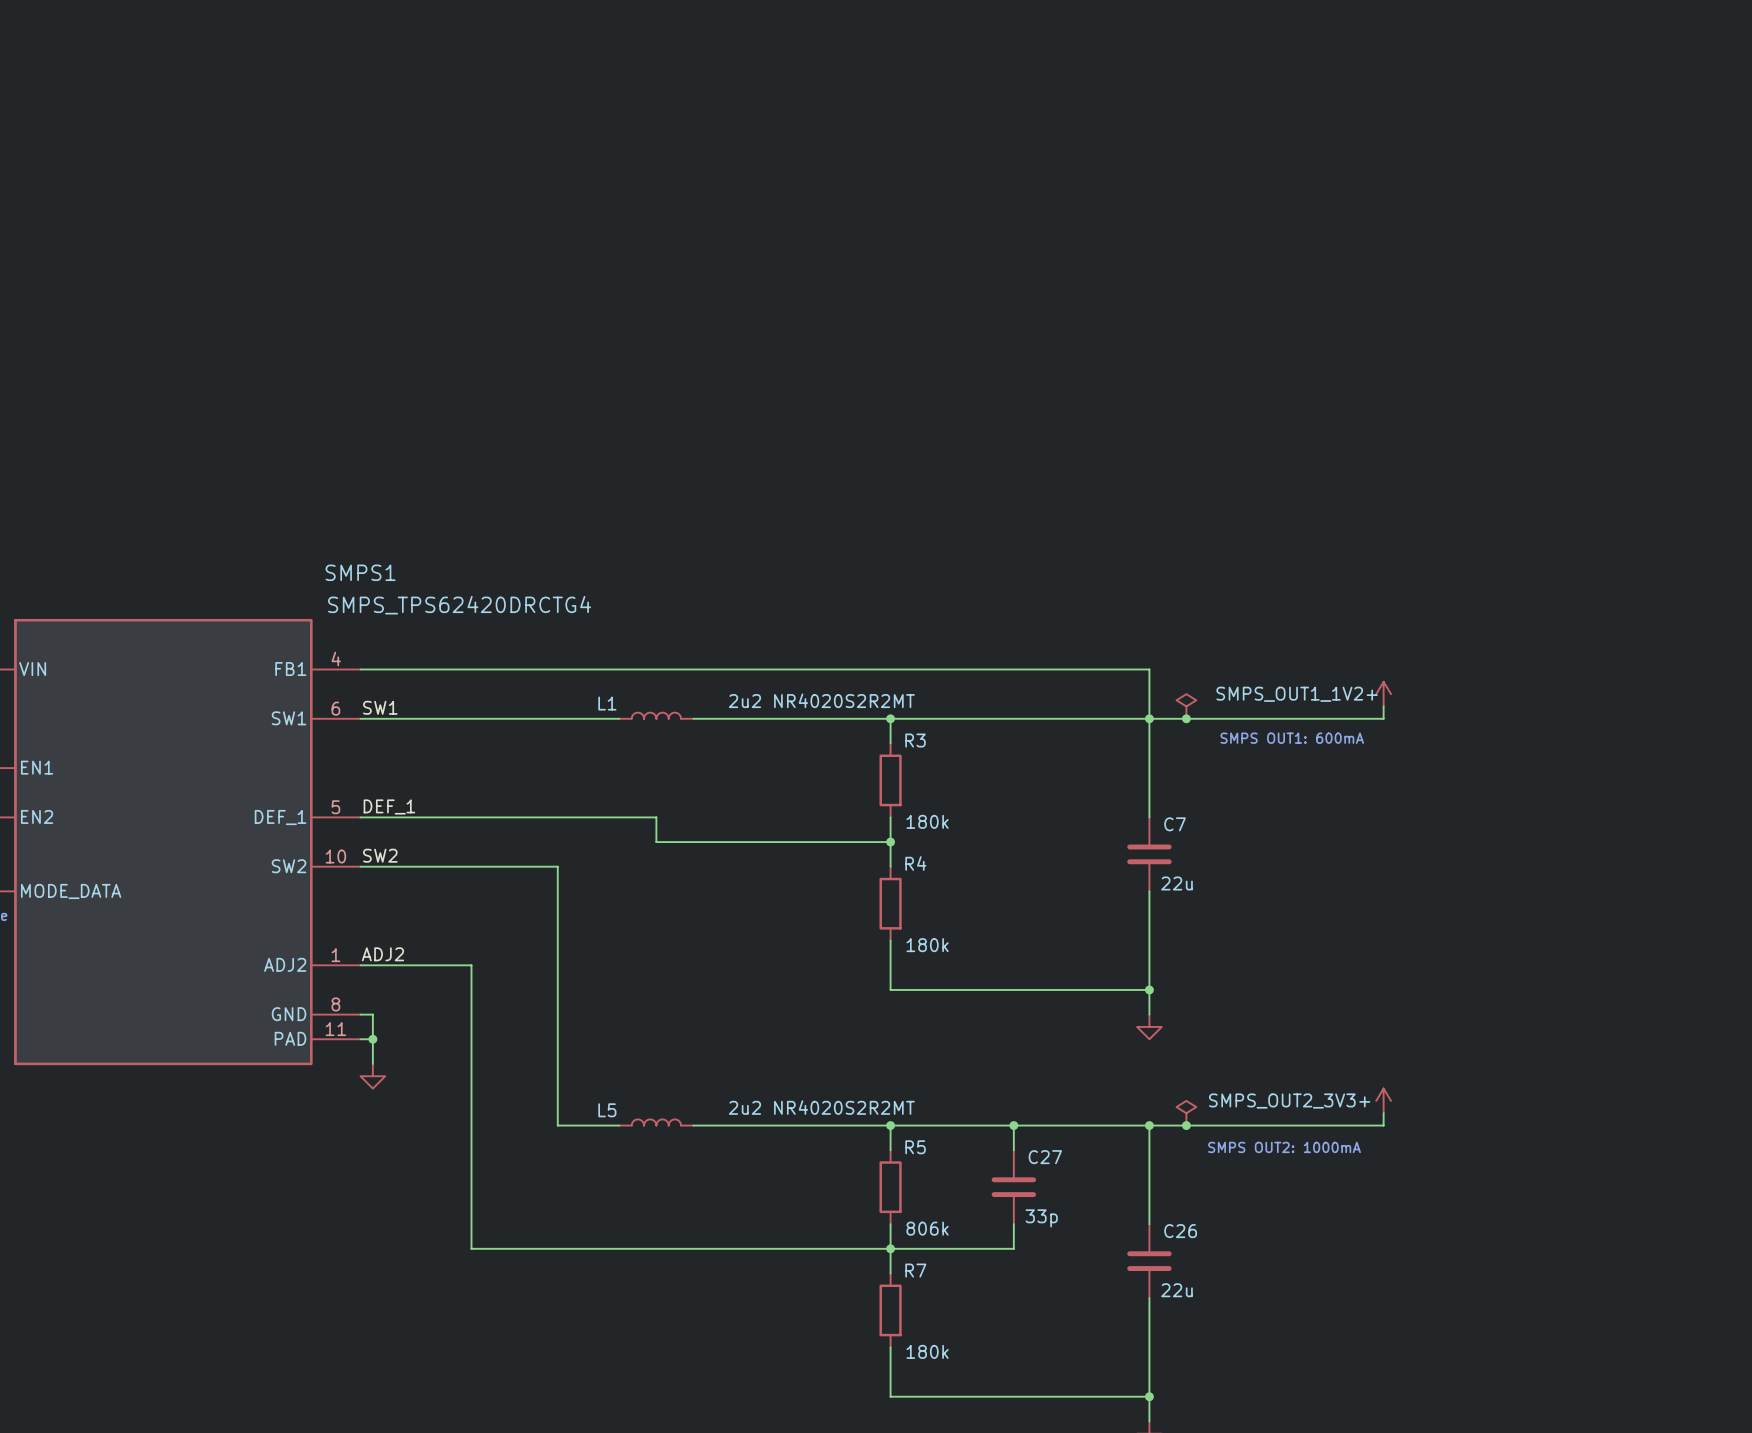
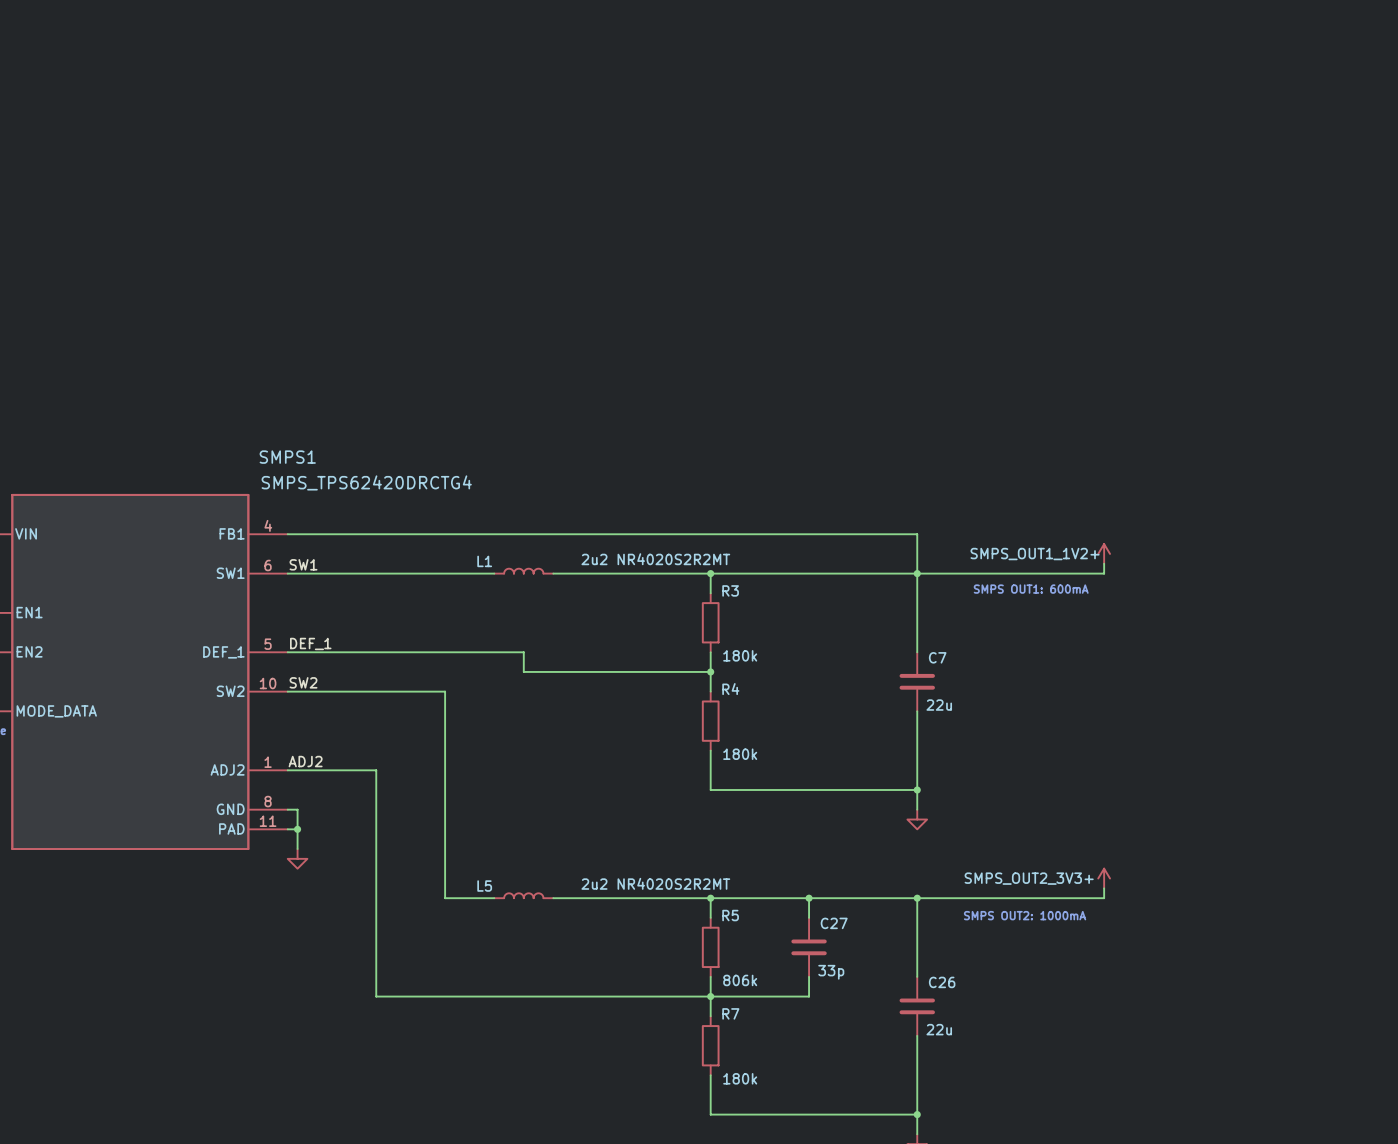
power symbol: (1186, 706) -> none
junction: (1186, 718) -> none
power symbol: (1186, 1113) -> none
junction: (1186, 1125) -> none

